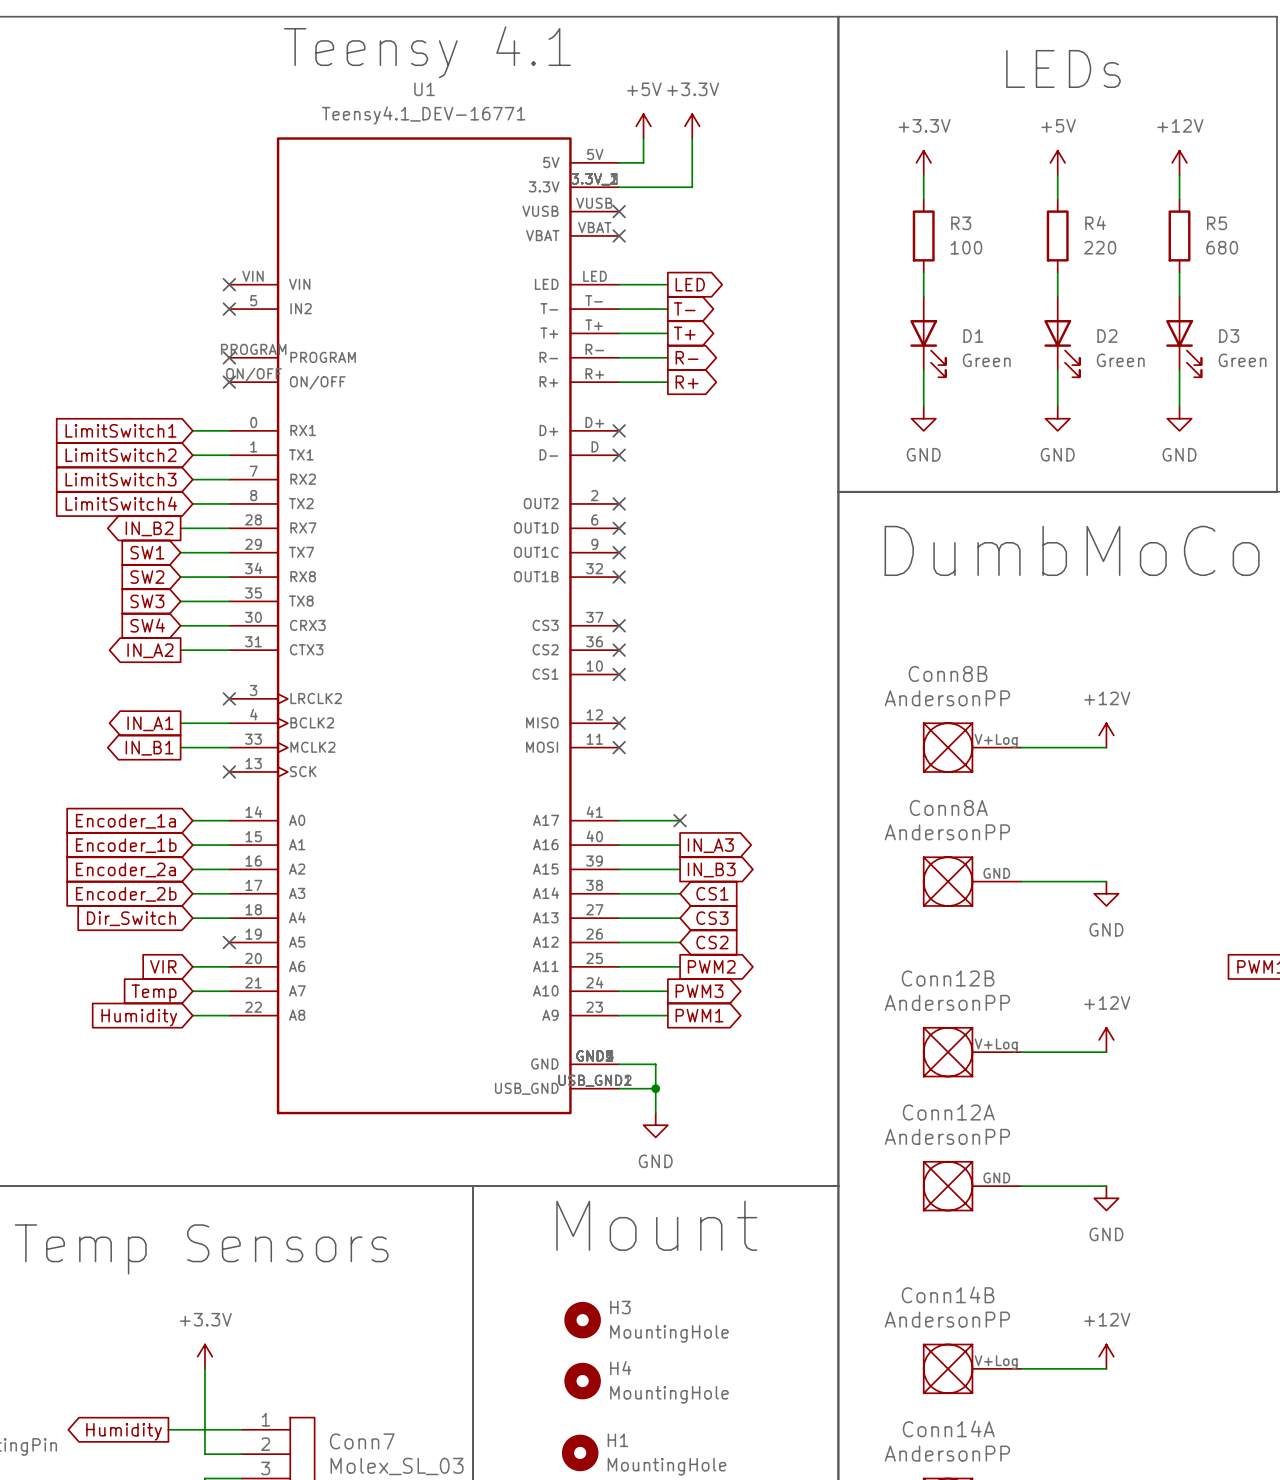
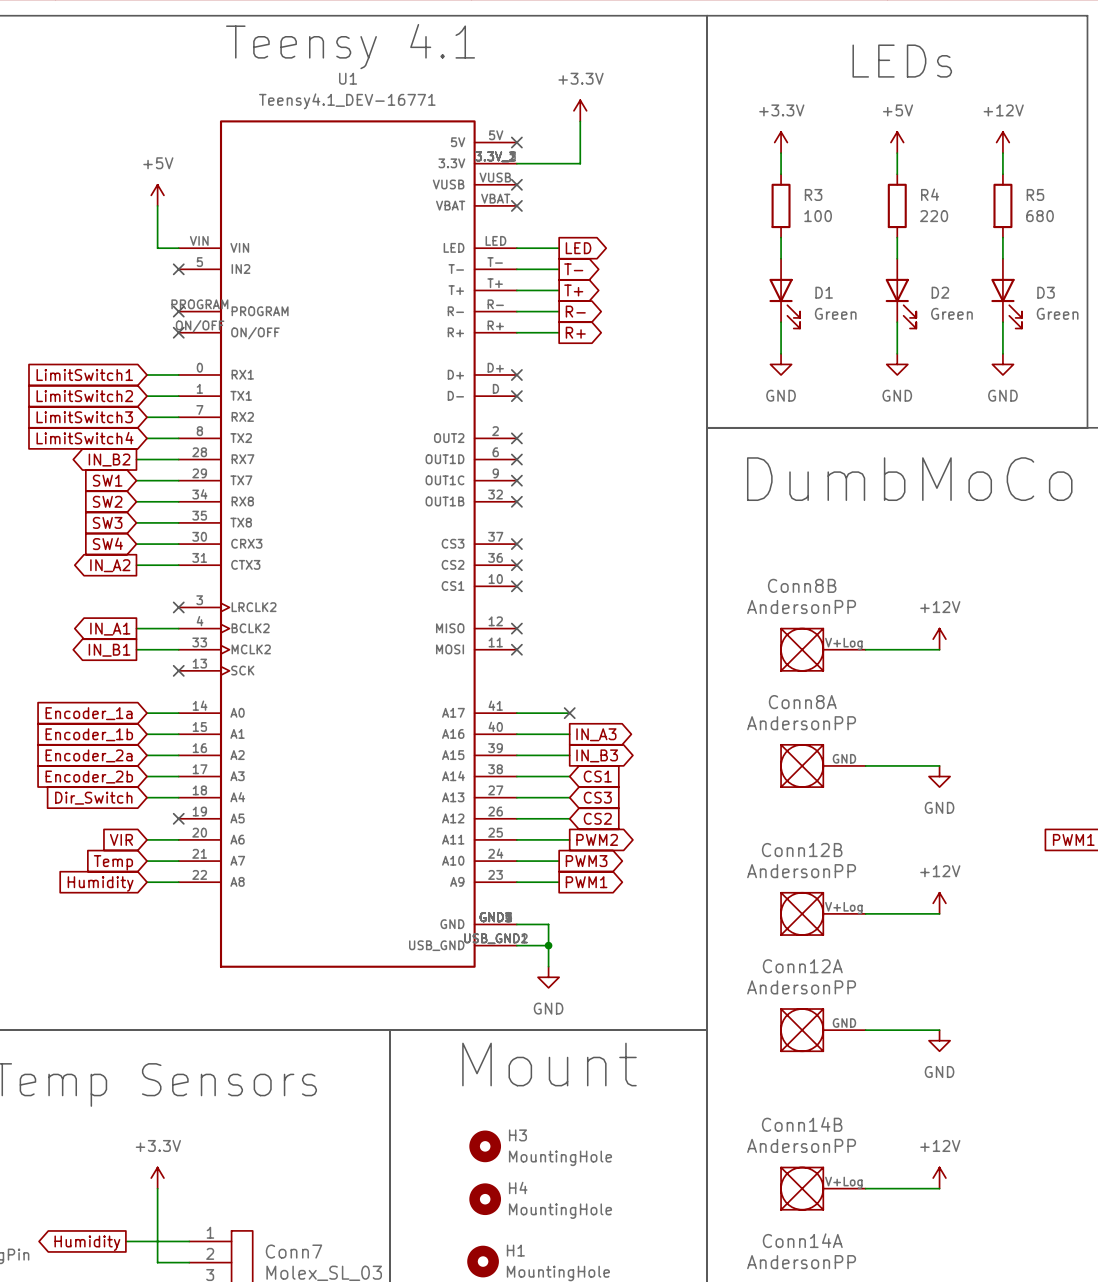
power symbol: +5V (643, 126) -> none
wire: (643, 138) (643, 162) (619, 162) -> none
no-connect mark: none -> (516, 142)
power symbol: none -> +5V (157, 195)
wire: none -> (157, 205) (157, 248) (178, 248)
no-connect mark: (229, 284) -> none

